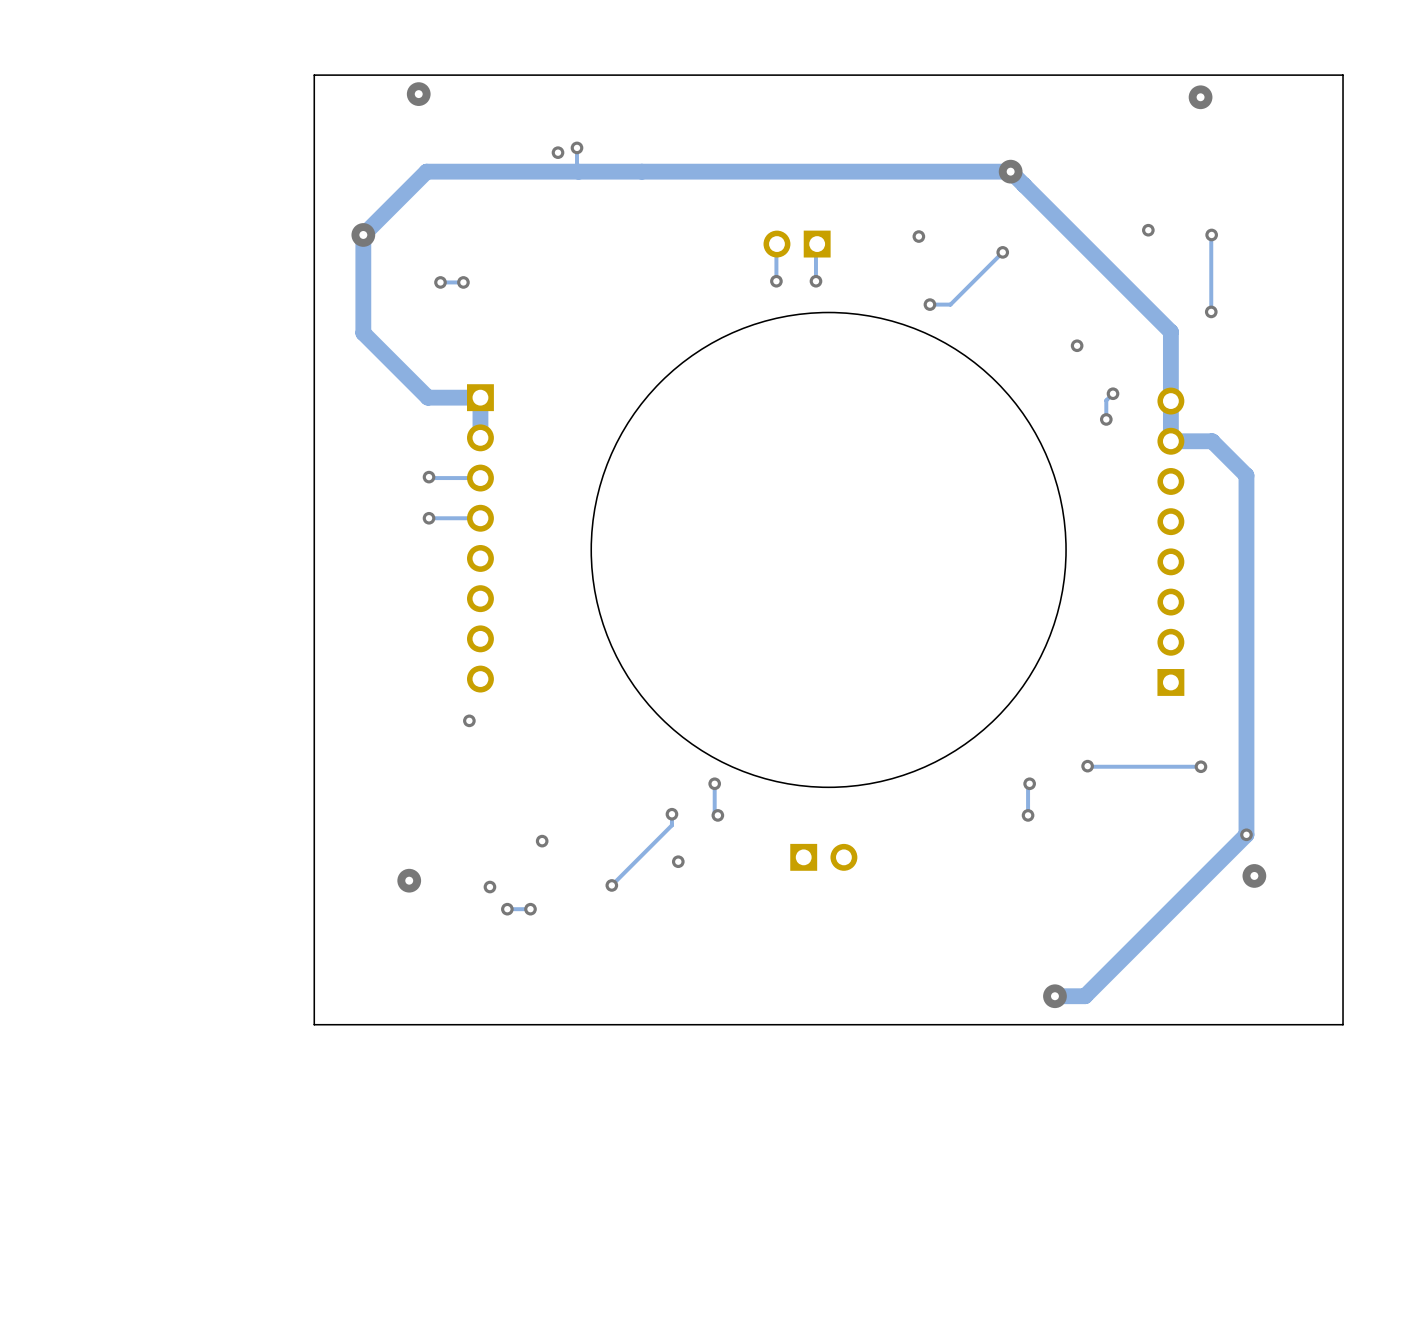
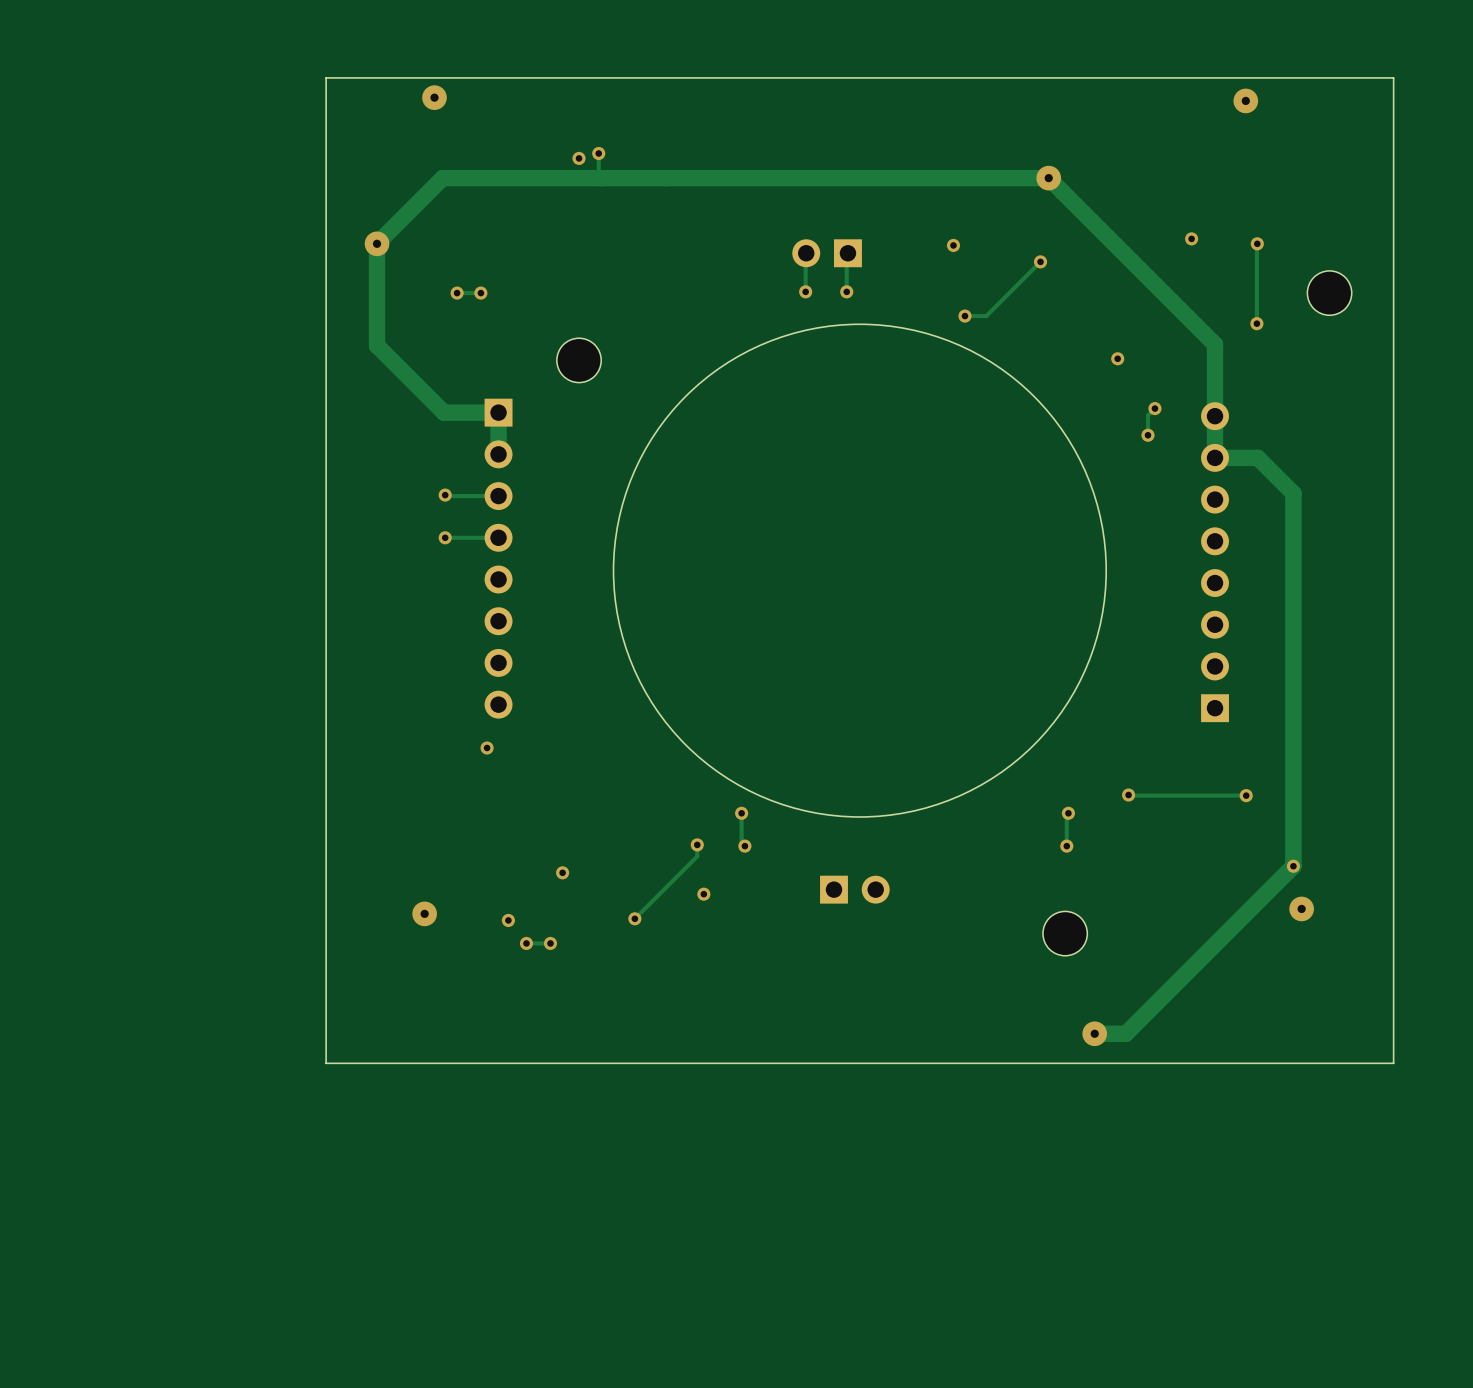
part: none -> (1329, 293)
part: none -> (579, 360)
part: none -> (1065, 933)

